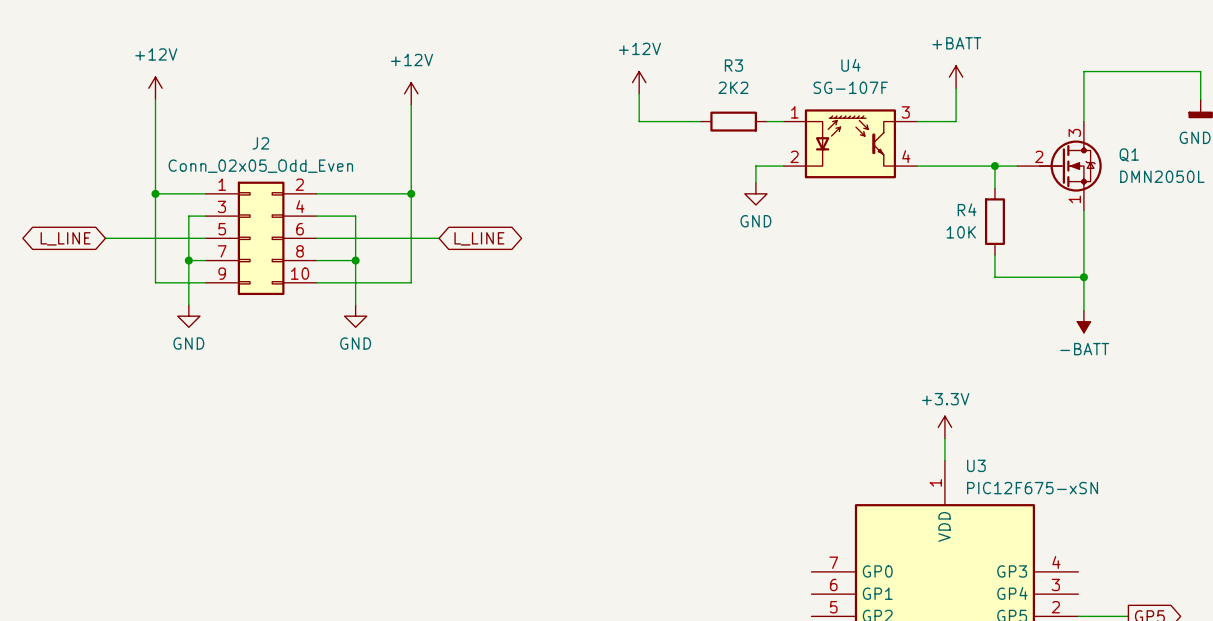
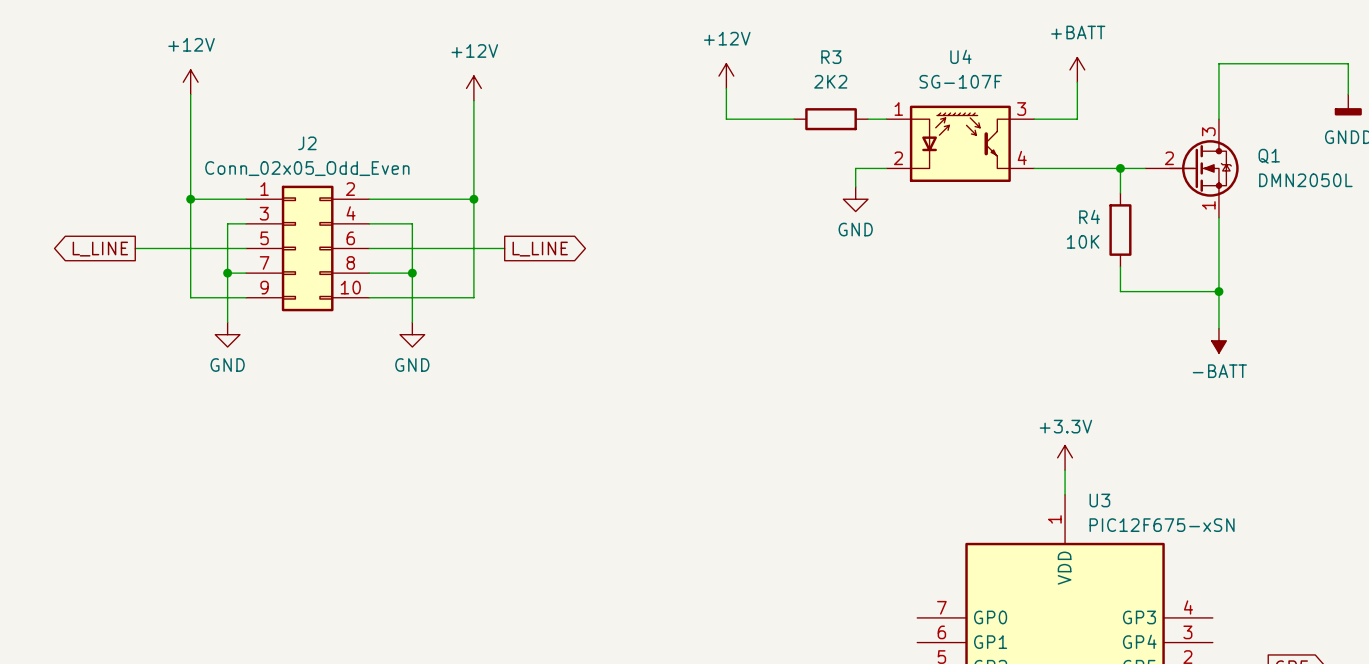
global label shape: bidirectional (65, 238) -> output (100, 249)
global label shape: bidirectional (479, 238) -> output (540, 249)

